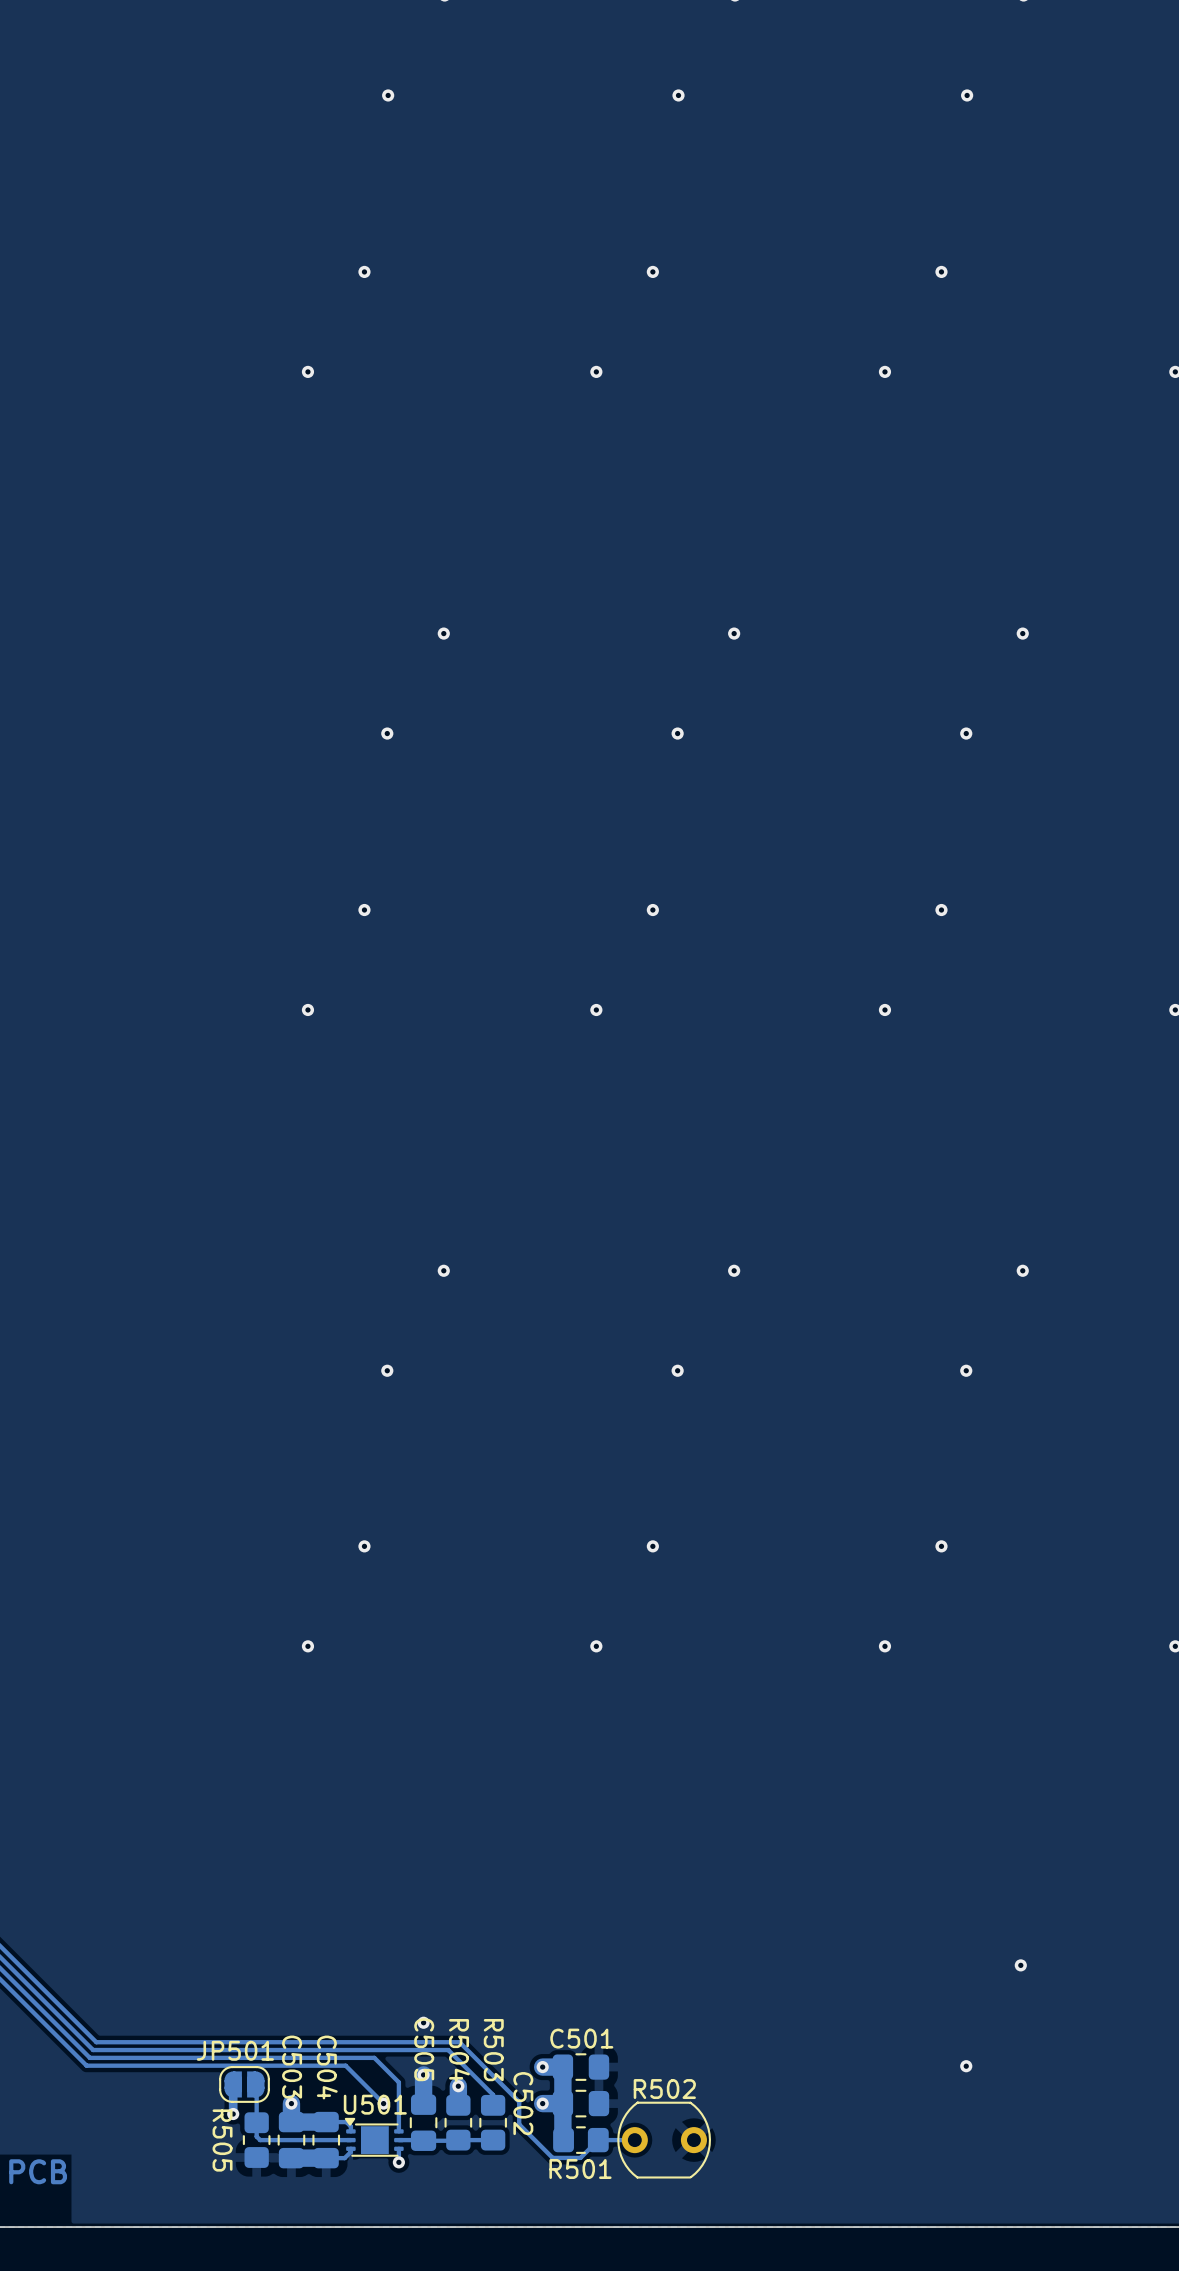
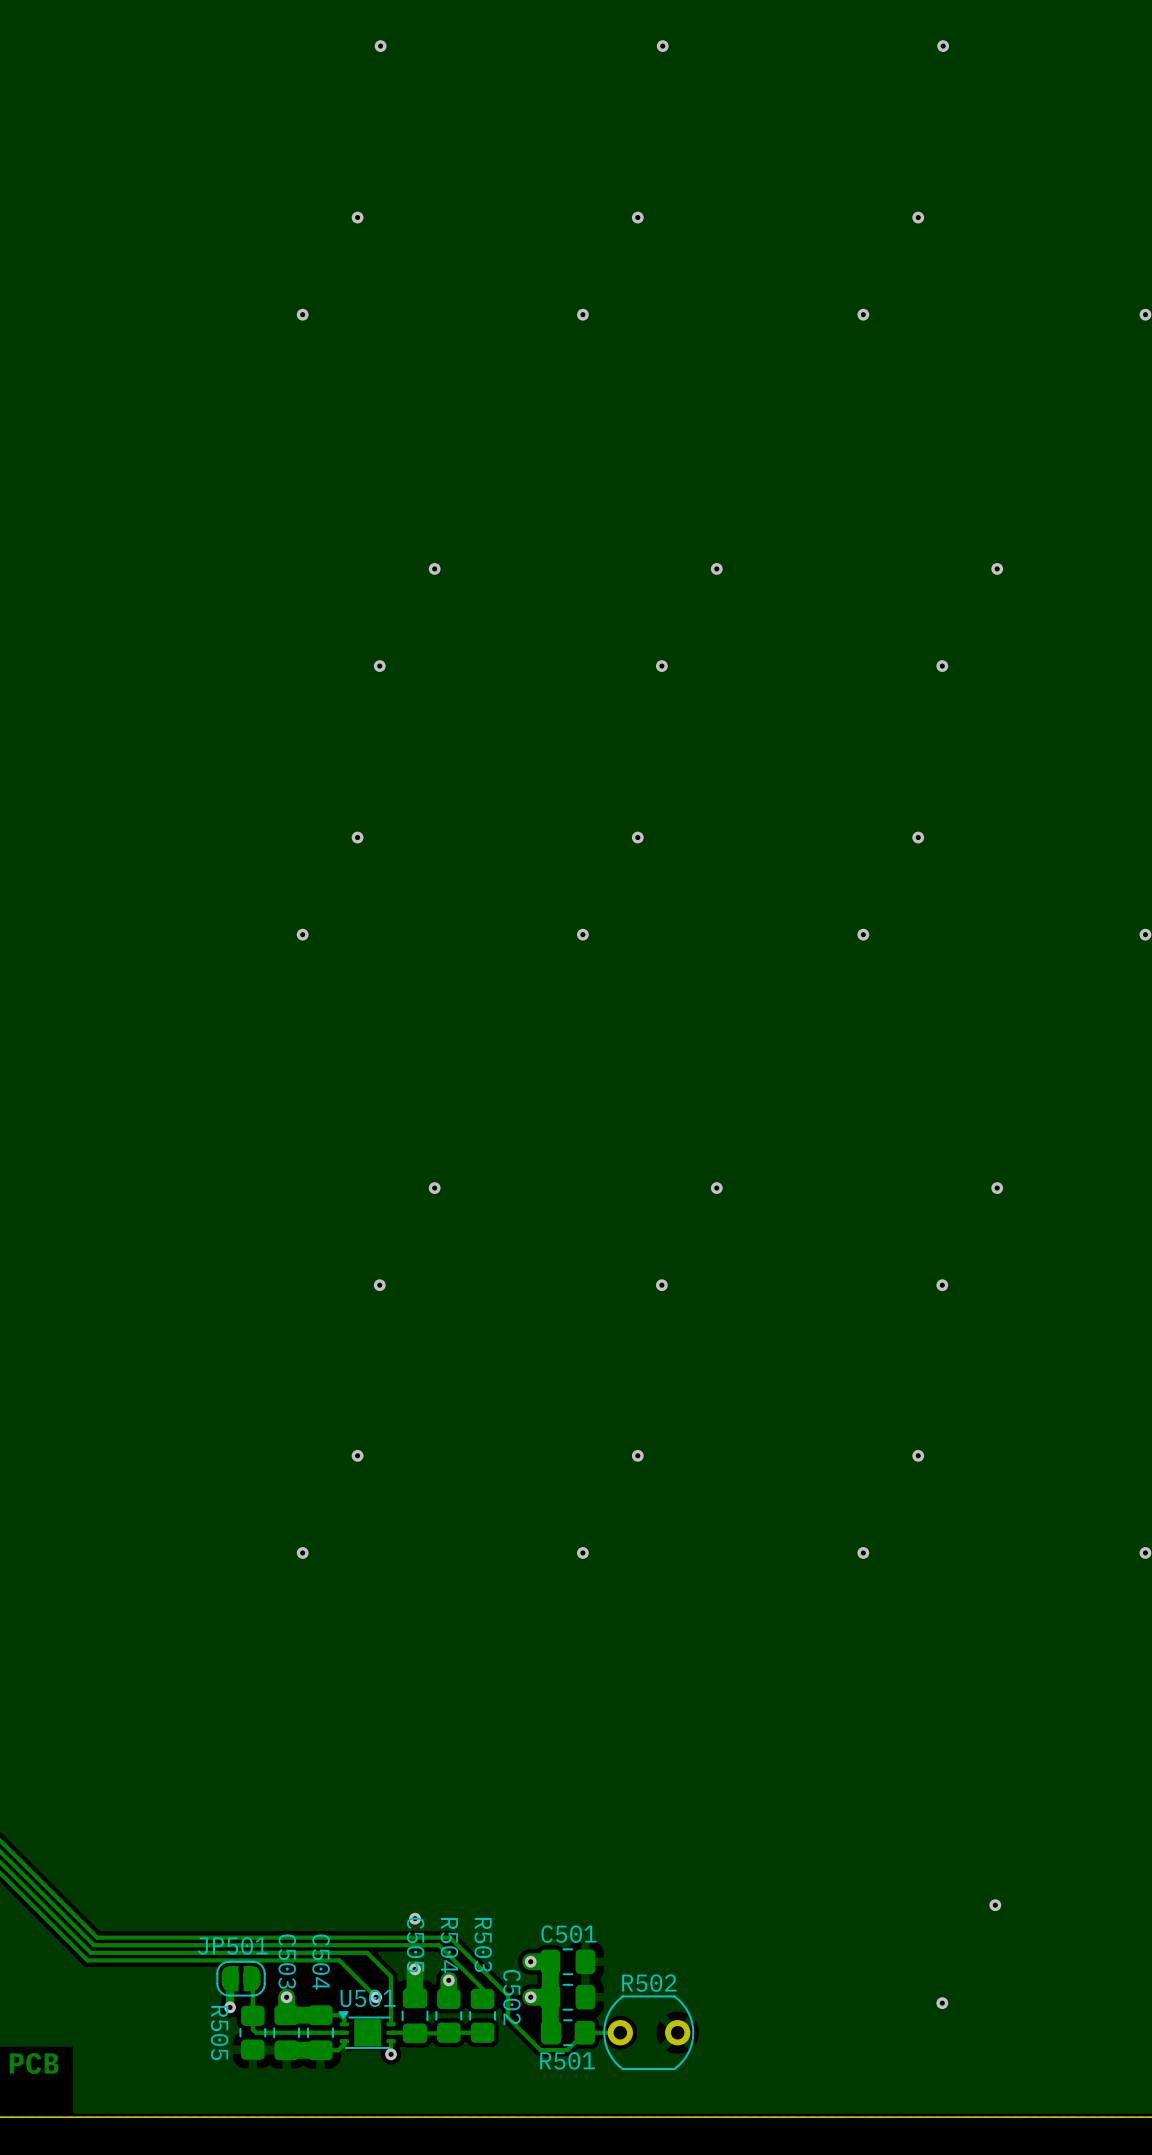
via: (1020, 1965) -> none
via: none -> (995, 1905)
via: (966, 2066) -> none
via: none -> (942, 2003)

